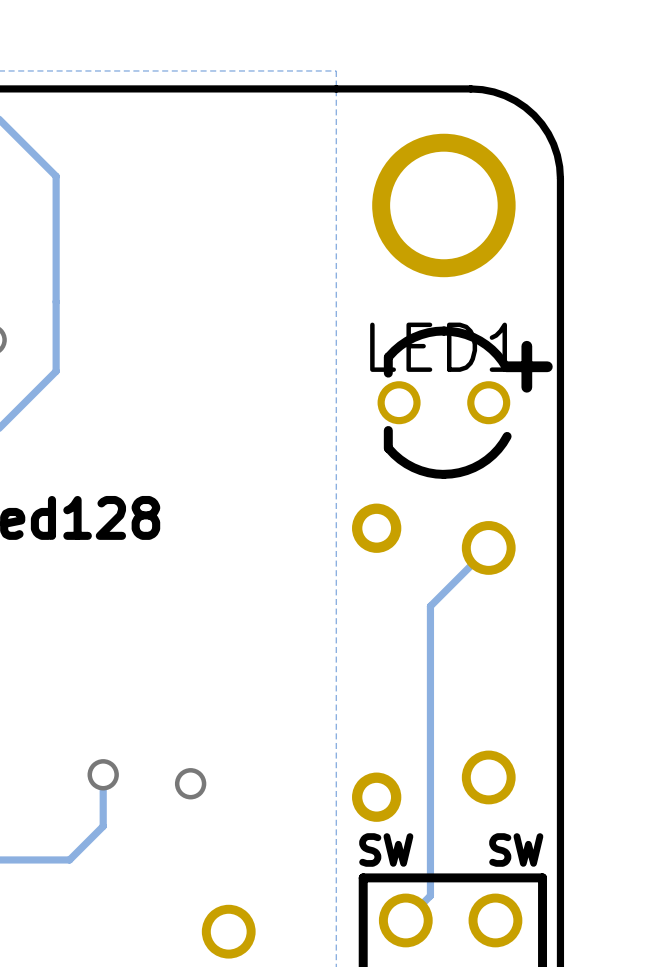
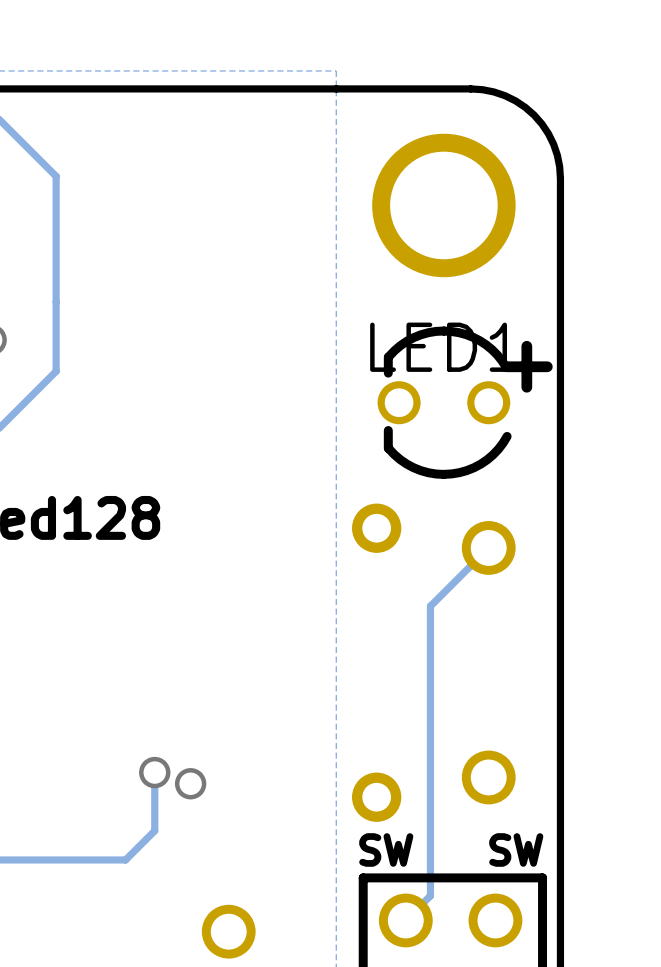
track: (103, 774) (103, 826) (69, 859) -> (154, 772) (154, 830) (125, 859) (69, 859)
via position: (103, 774) -> (154, 772)

